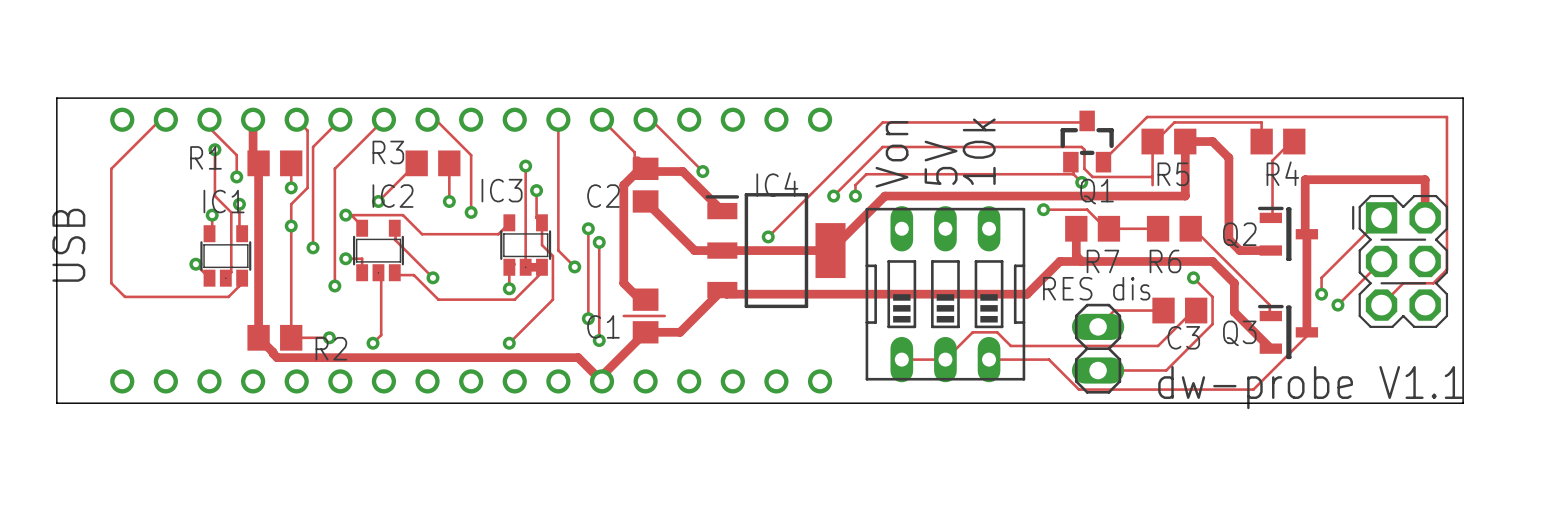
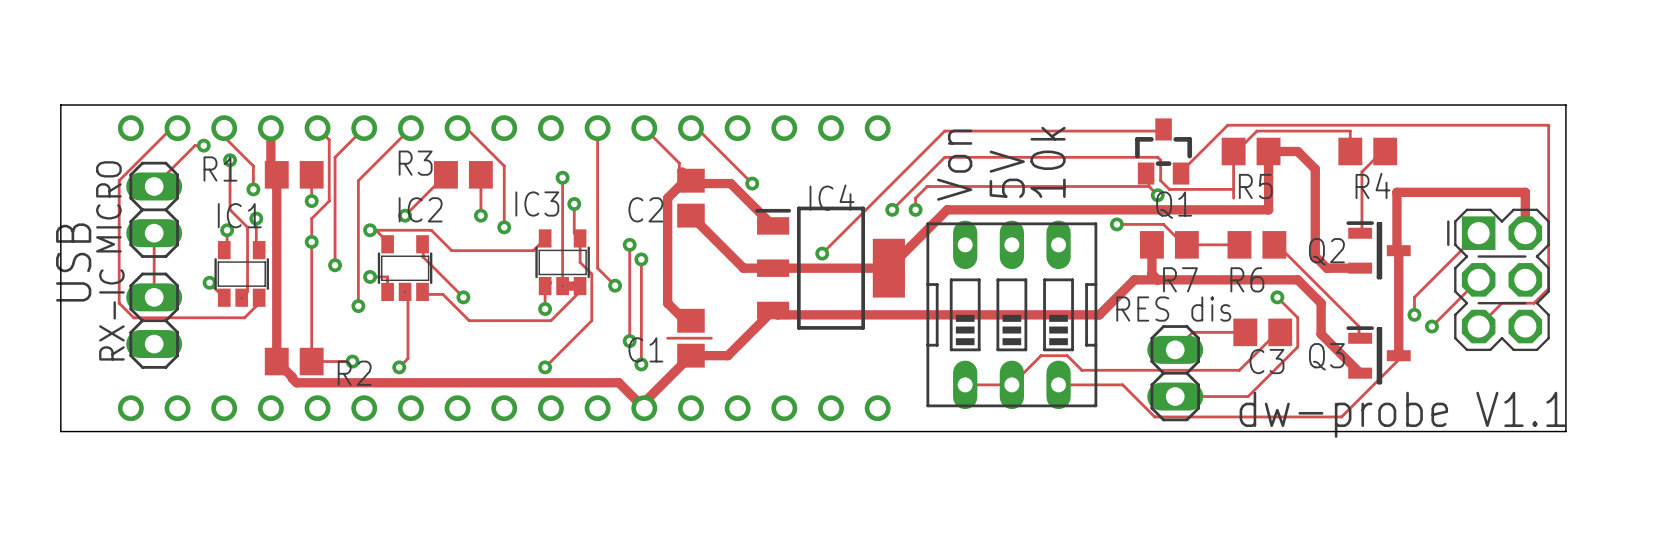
track: none -> (203, 145) (195, 145) (154, 186)
via: none -> (203, 145)
MICRO: none -> (154, 209)
track: none -> (154, 233) (154, 297)
RX-IC: none -> (154, 320)

